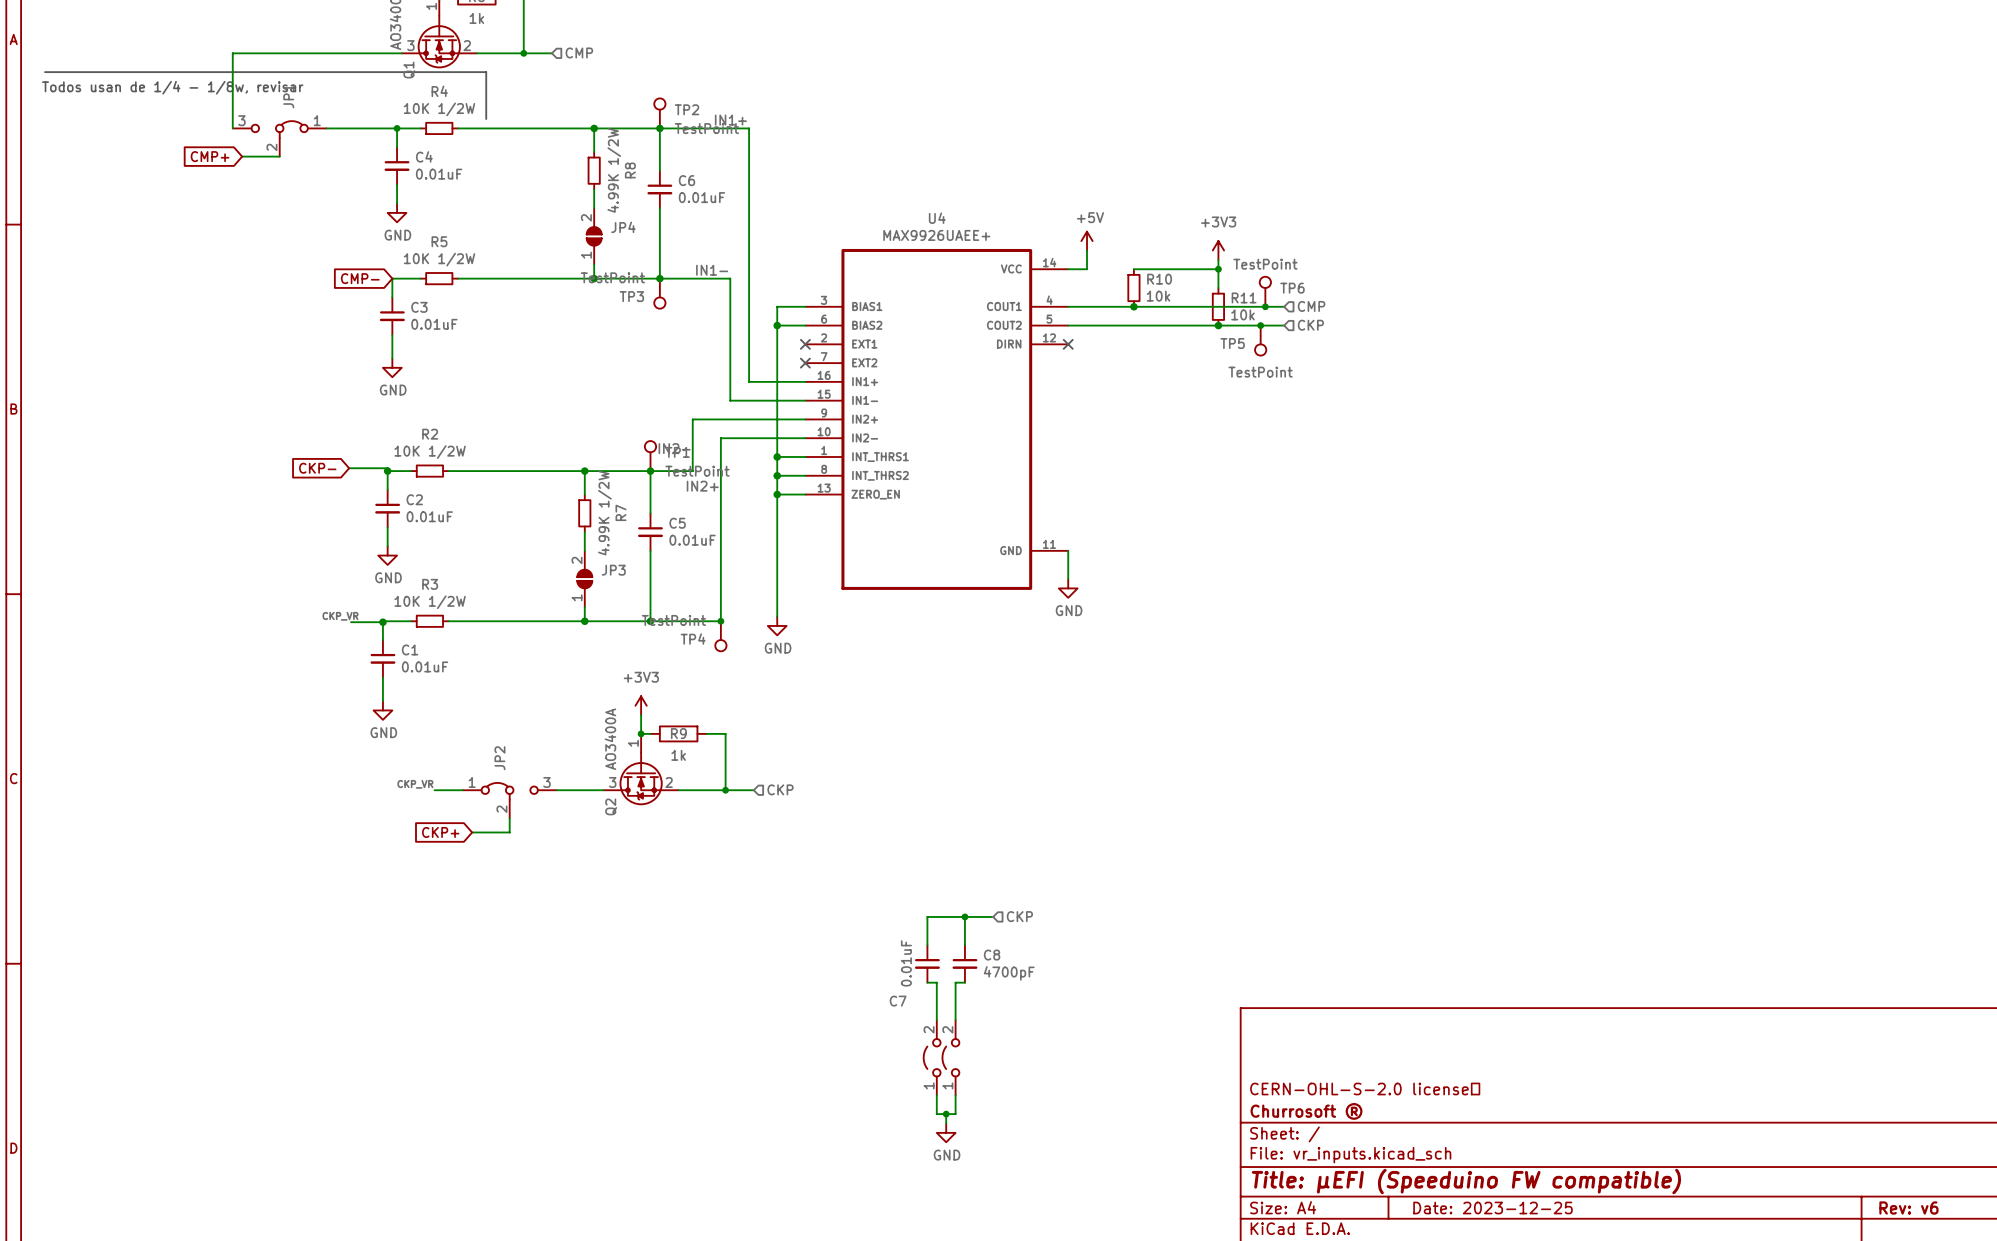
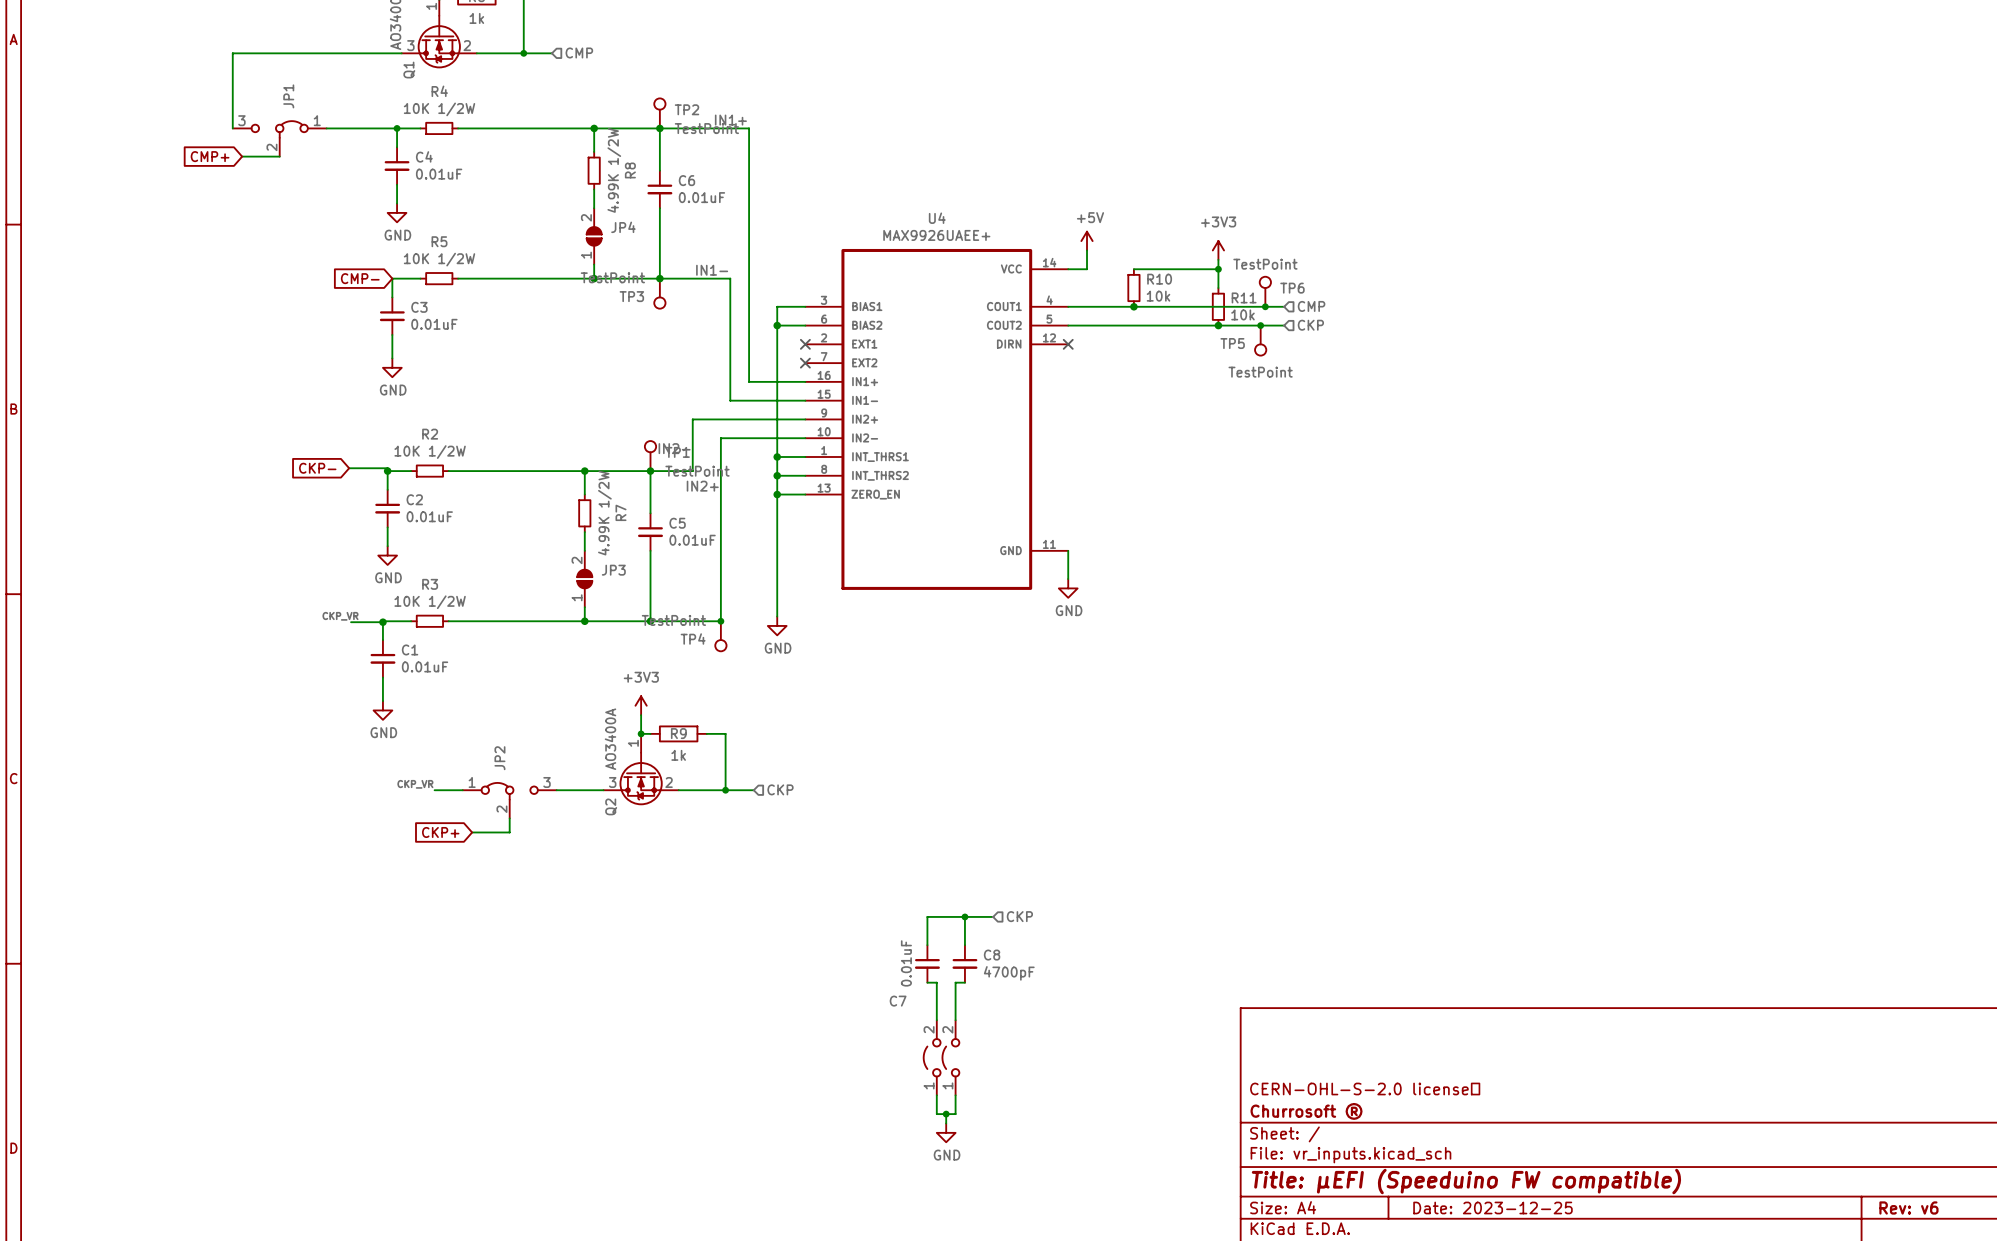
line: (45, 72) (486, 72) (486, 119) -> none
text: Todos usan de 1/4 - 1/8w, revisar (172, 87) -> none

